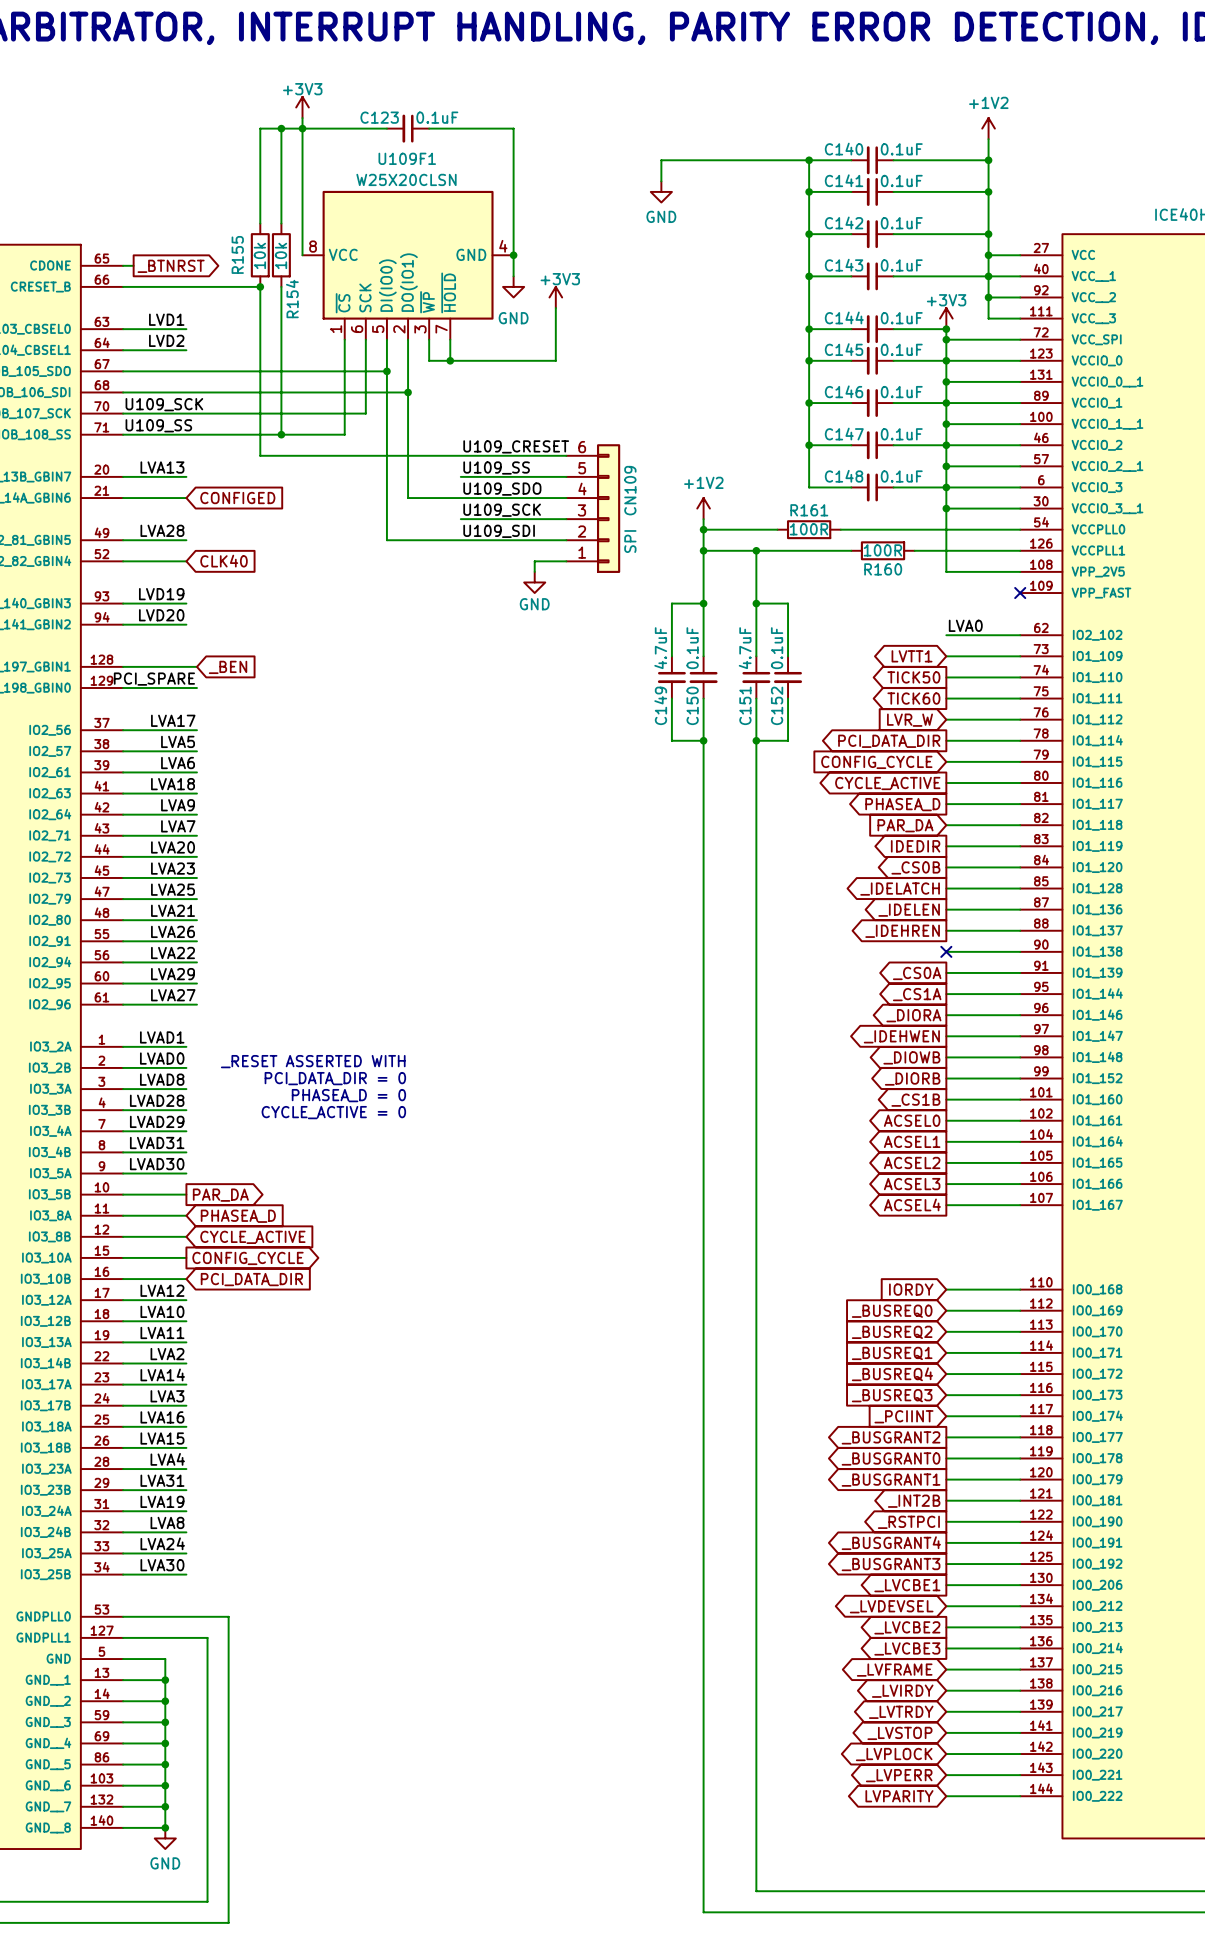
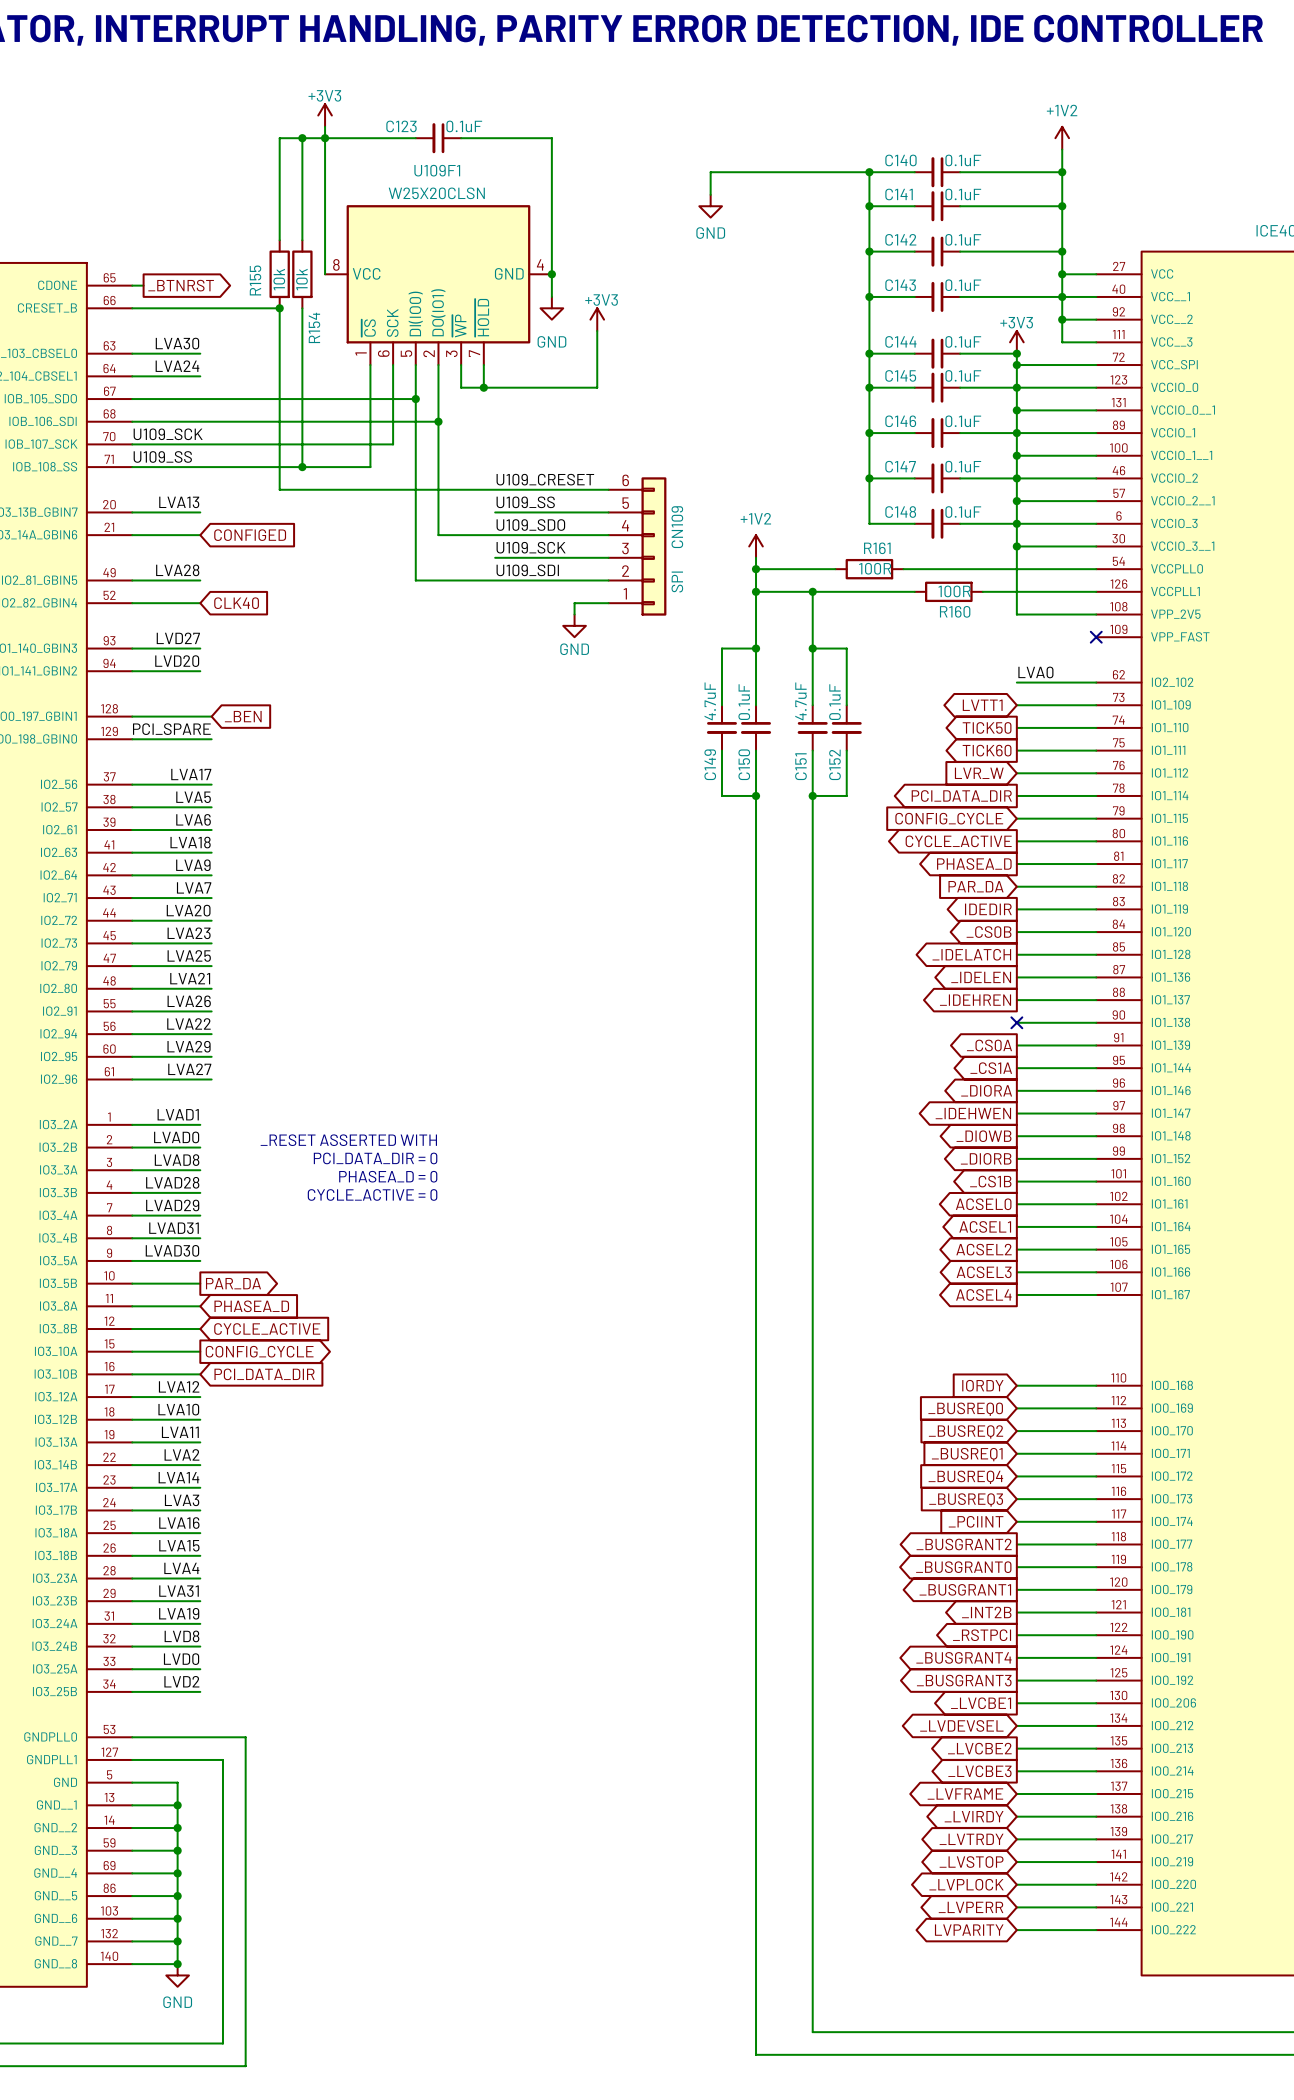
label: LVD1 (166, 319) -> LVA30 (177, 343)
label: LVD2 (166, 340) -> LVA24 (177, 366)
label: LVD19 (161, 594) -> LVD27 (178, 638)
label: LVA8 (167, 1522) -> LVD8 (181, 1636)
label: LVA24 (162, 1543) -> LVD0 (181, 1659)
label: LVA30 (162, 1565) -> LVD2 (181, 1681)

